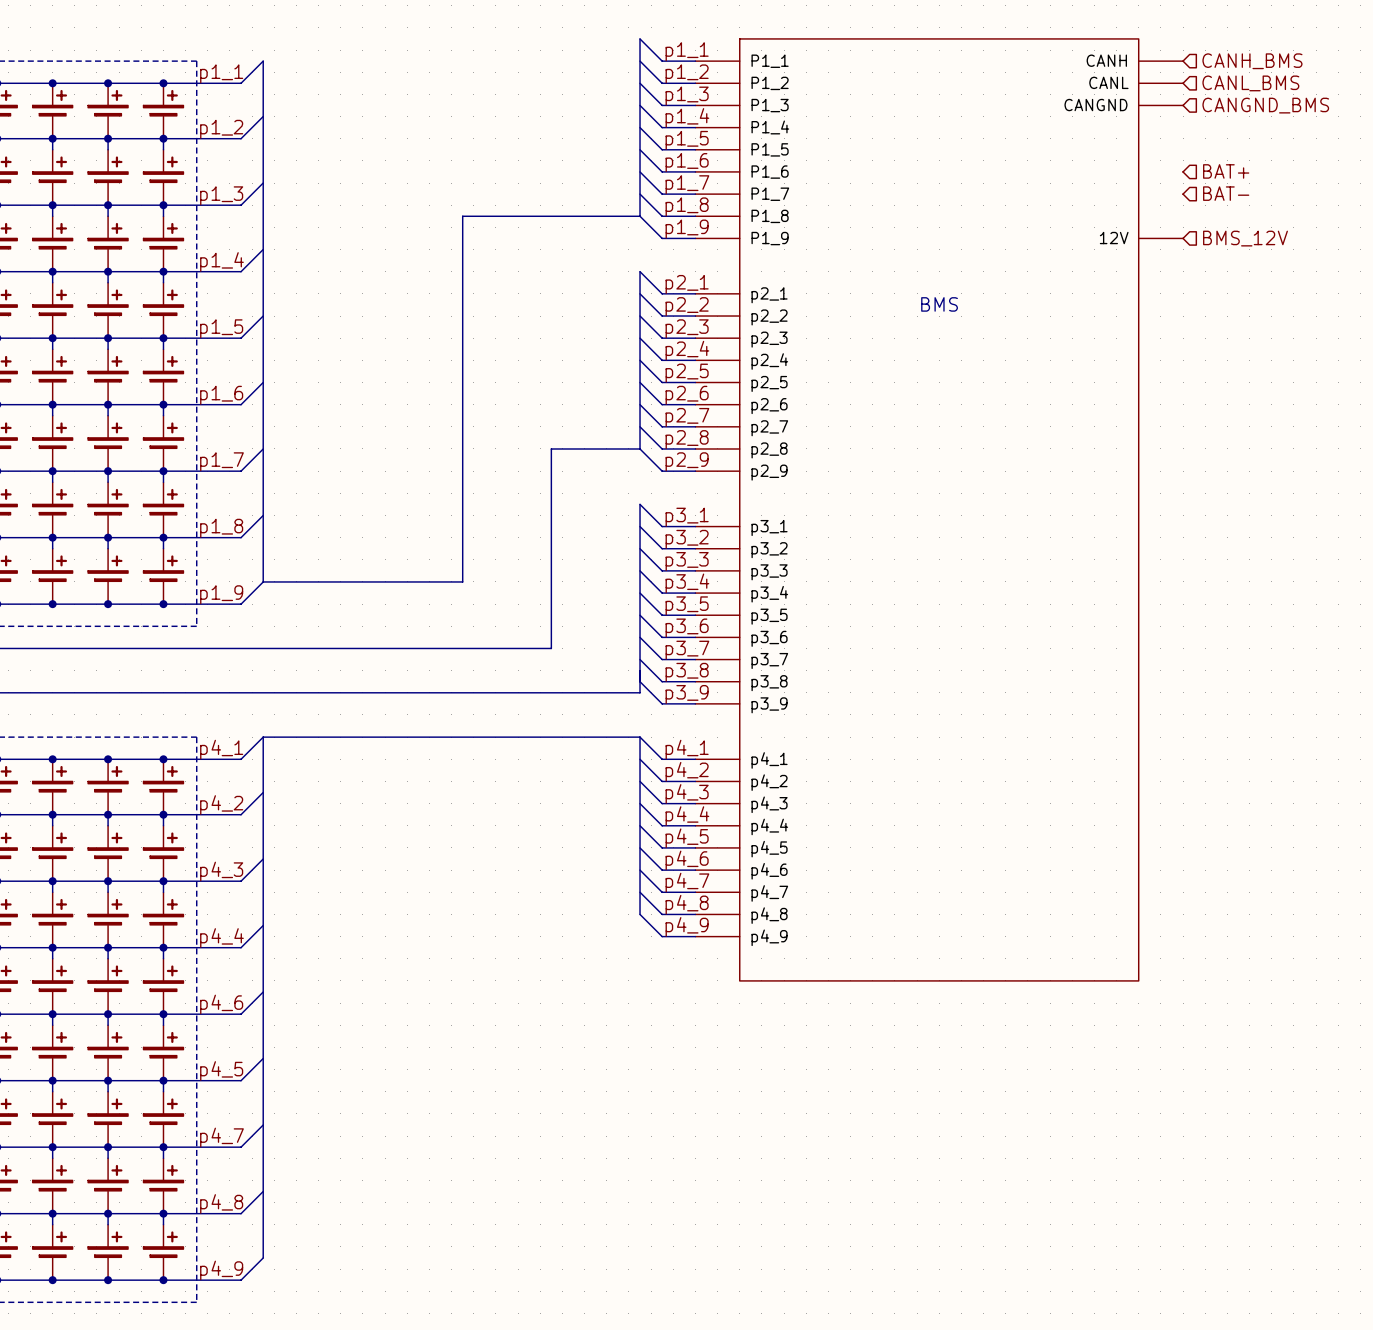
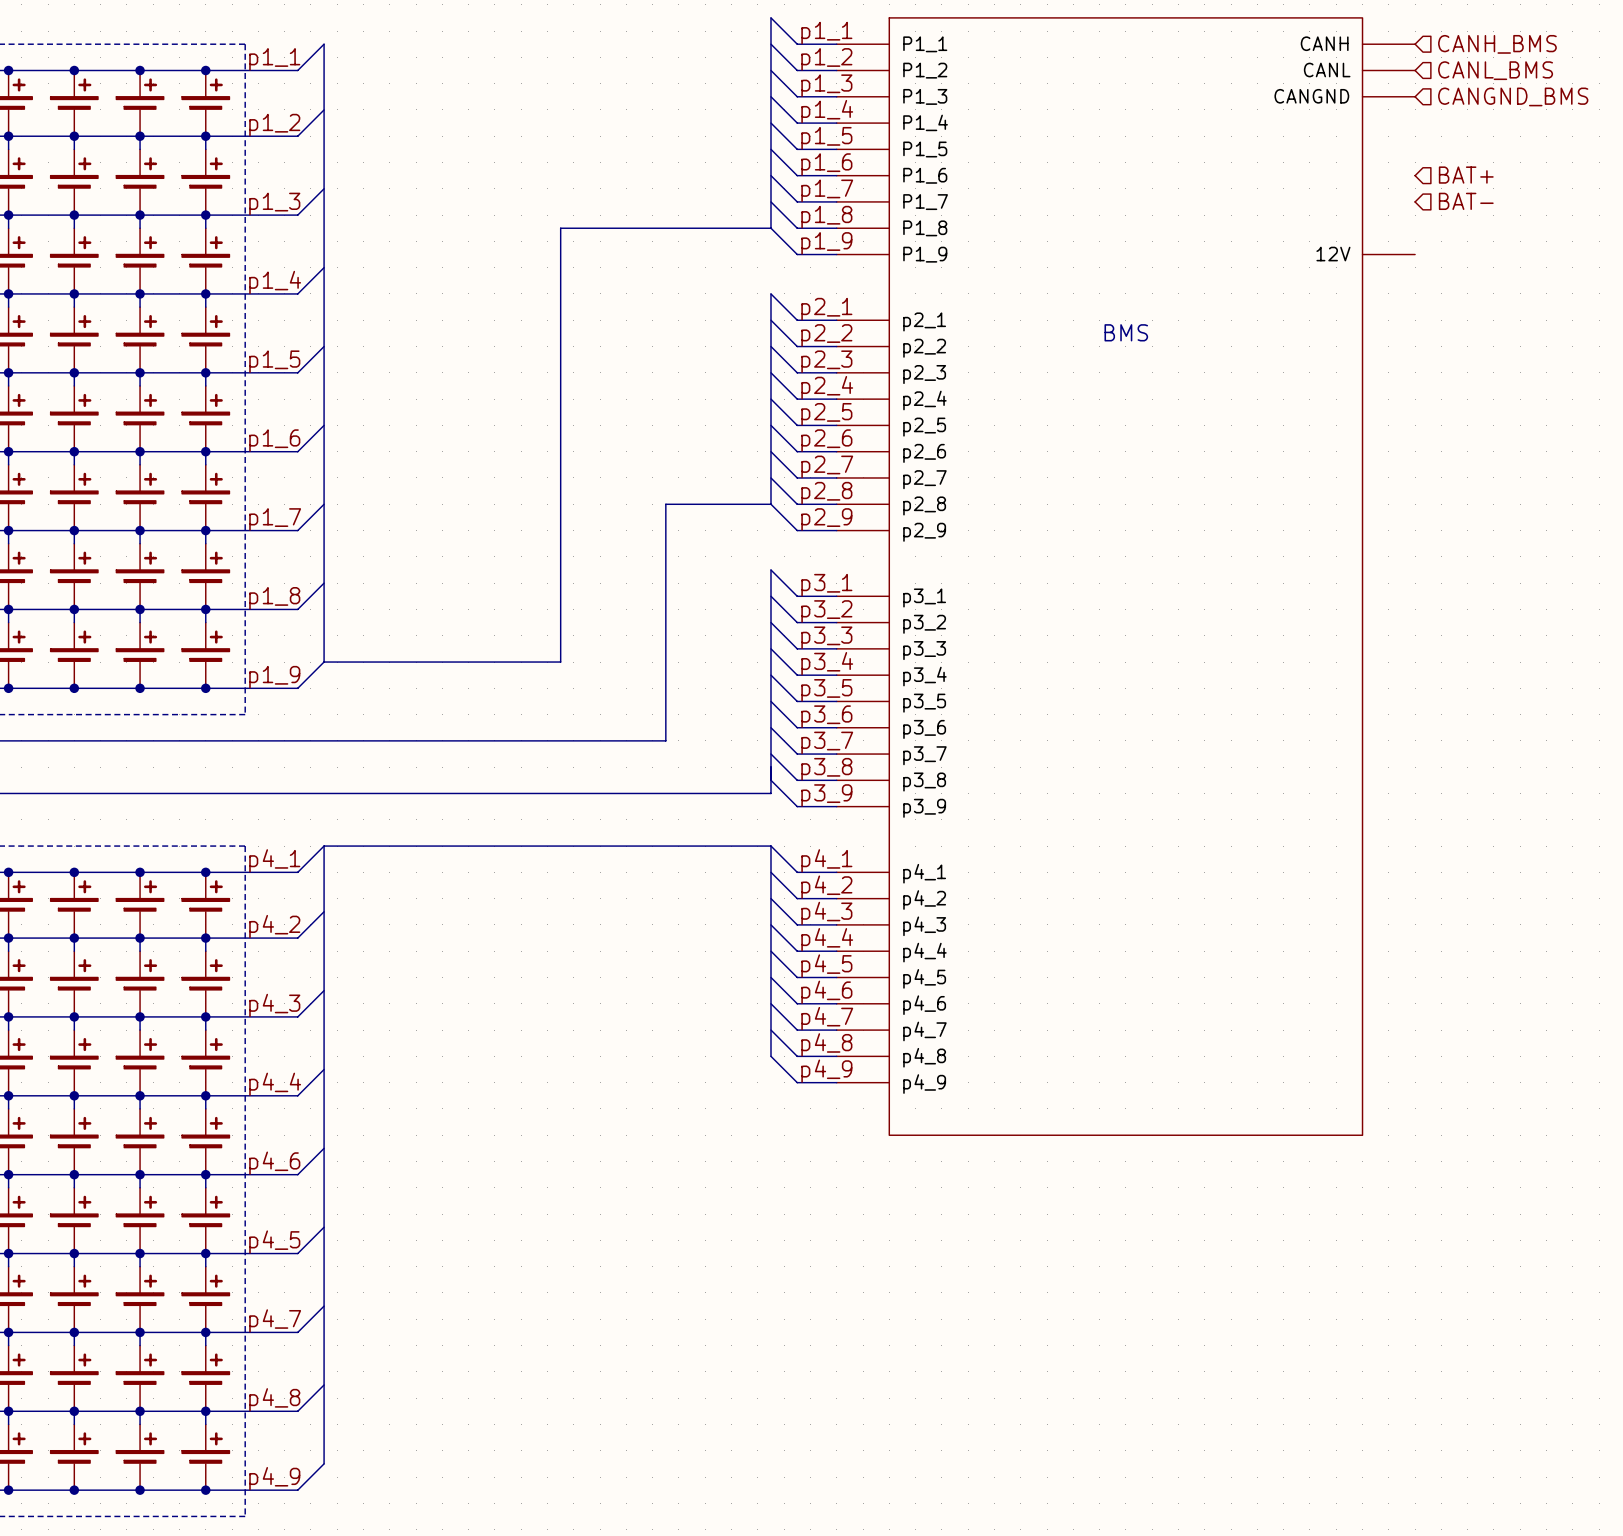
hierarchical label: BMS_12V (1245, 238) -> none

